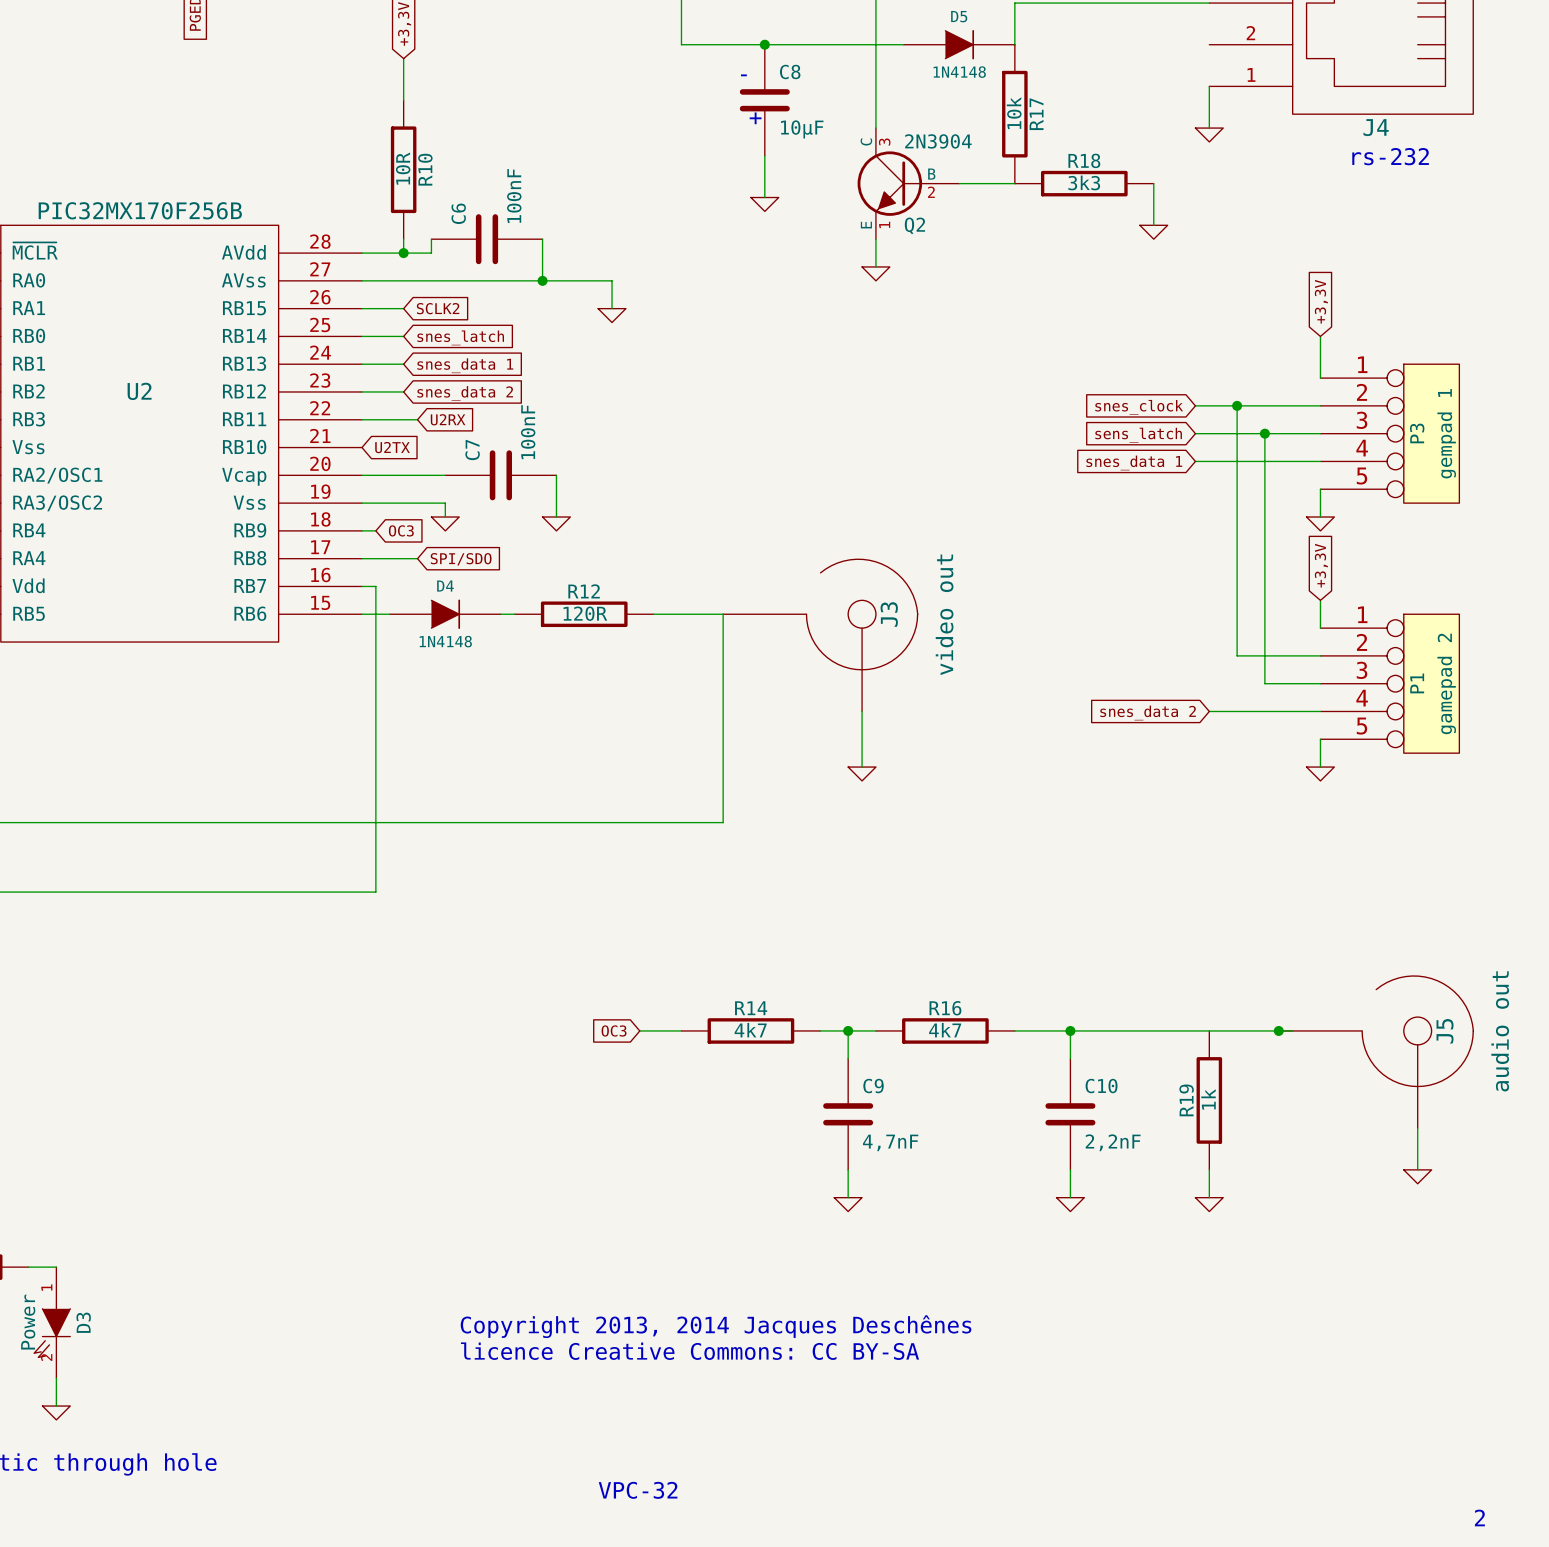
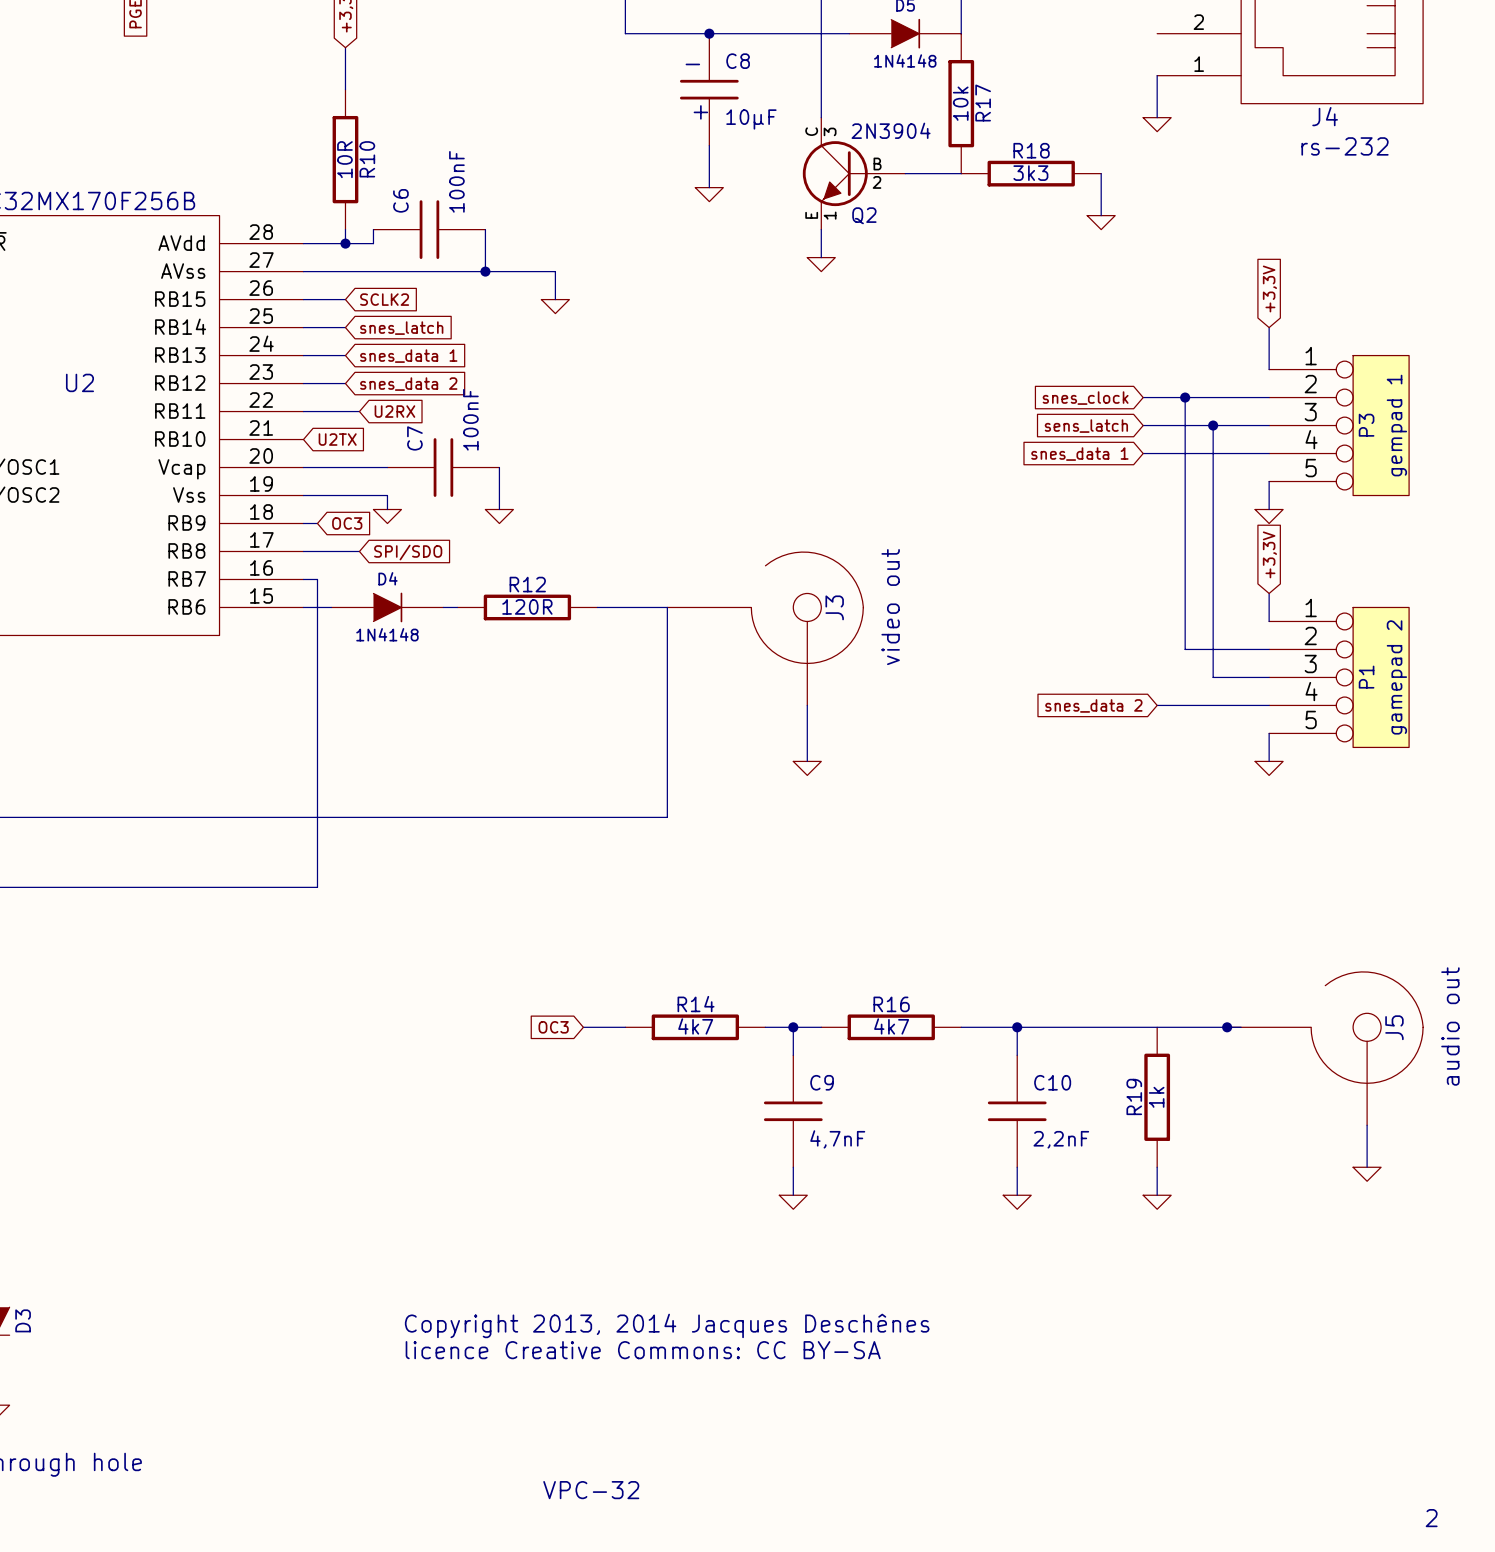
C8 symbol: [739, 44, 790, 156] -> [679, 33, 739, 146]
C6 symbol: [431, 214, 543, 265] -> [373, 200, 486, 260]
C7 symbol: [445, 450, 557, 501] -> [387, 438, 500, 497]
C9 symbol: [823, 1058, 874, 1170] -> [763, 1055, 823, 1168]
C10 symbol: [1045, 1058, 1096, 1170] -> [987, 1055, 1047, 1168]

